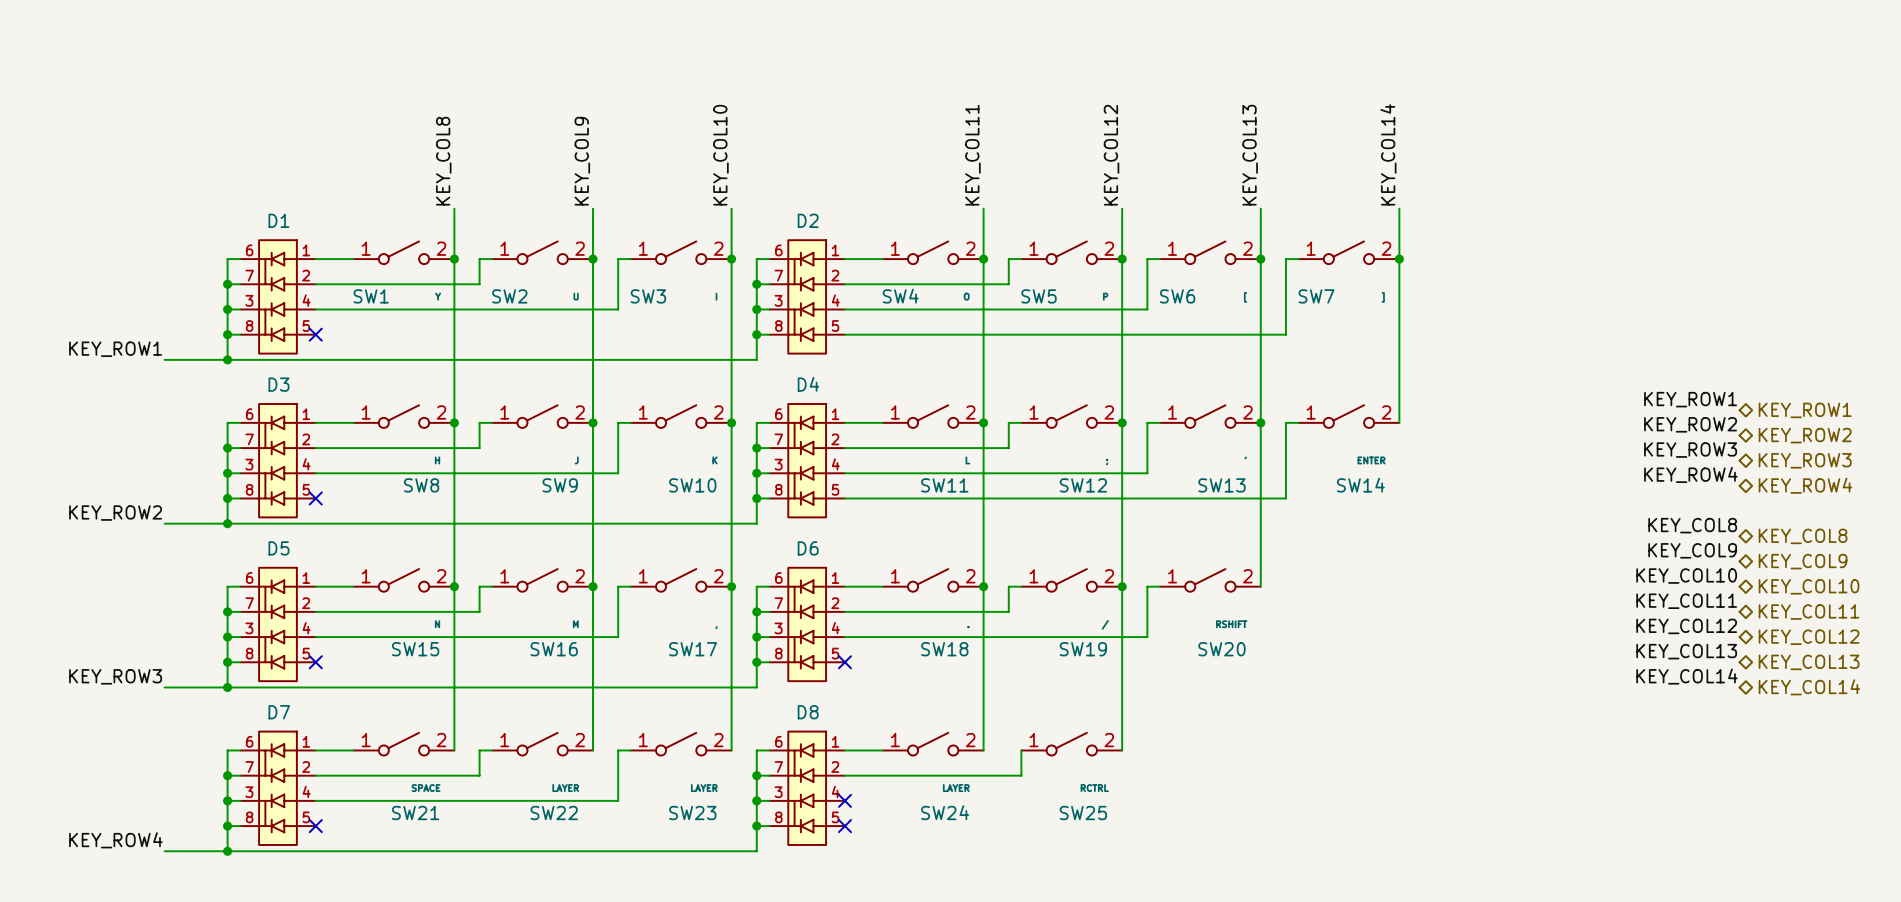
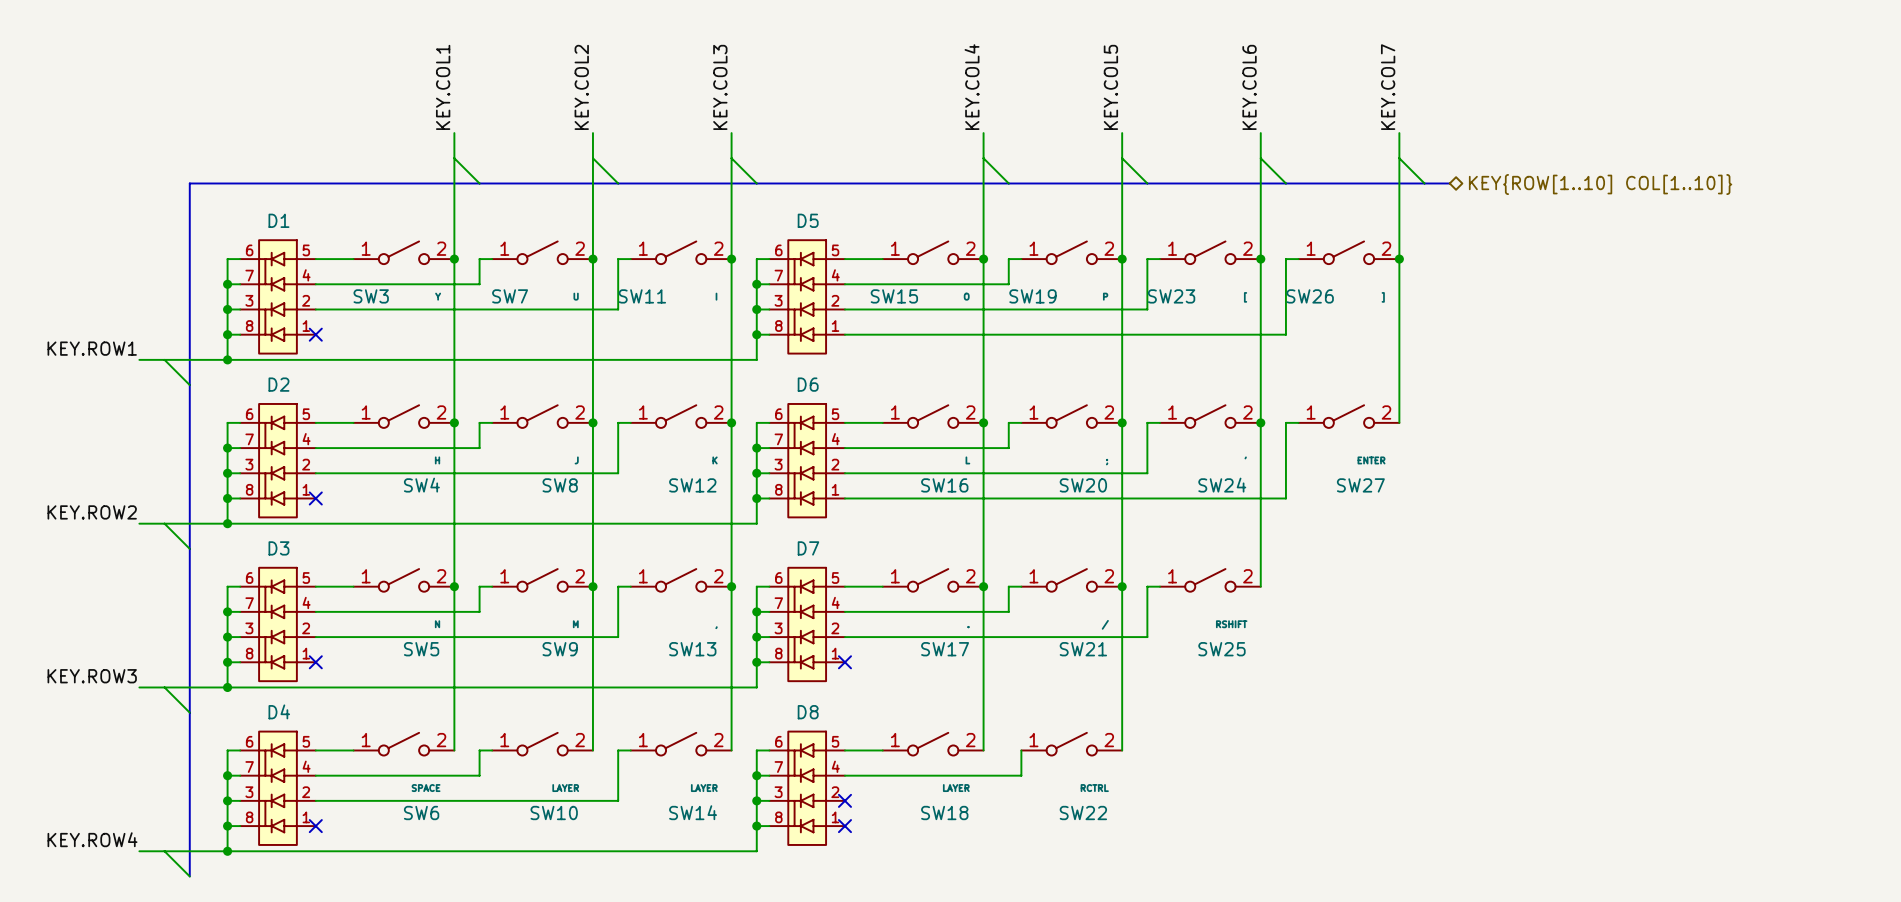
wire: none -> (454, 133) (454, 208)
wire: none -> (592, 133) (592, 208)
wire: none -> (731, 133) (731, 208)
wire: none -> (983, 133) (983, 208)
wire: none -> (1122, 133) (1122, 208)
wire: none -> (1260, 133) (1260, 208)
wire: none -> (1399, 133) (1399, 208)
label: KEY_COL14 (1388, 154) -> KEY.COL7 (1388, 87)
label: KEY_COL10 (720, 155) -> KEY.COL3 (720, 87)
label: KEY_COL11 (972, 155) -> KEY.COL4 (972, 87)
label: KEY_COL12 (1111, 155) -> KEY.COL5 (1110, 87)
label: KEY_COL13 (1250, 155) -> KEY.COL6 (1249, 87)
wire: none -> (454, 158) (479, 183)
wire: none -> (592, 158) (618, 183)
wire: none -> (731, 158) (756, 183)
wire: none -> (983, 158) (1008, 183)
wire: none -> (1122, 158) (1147, 183)
wire: none -> (1260, 158) (1285, 183)
wire: none -> (1399, 158) (1424, 183)
label: KEY_COL8 (443, 161) -> KEY.COL1 (443, 87)
label: KEY_COL9 (582, 161) -> KEY.COL2 (581, 87)
bus: none -> (1449, 183) (189, 183) (189, 876)
hierarchical label: none -> KEY{ROW[1..10] COL[1..10]} (1600, 184)
D1 pin number: 1 (306, 250) -> 5 (306, 250)
D2 pin number: 1 (835, 250) -> 5 (306, 414)
D1 pin number: 2 (306, 275) -> 4 (306, 275)
D2 pin number: 2 (835, 275) -> 4 (306, 439)
SW1 name: SW1 (371, 296) -> SW3 (371, 296)
SW2 name: SW2 (509, 296) -> SW7 (510, 296)
SW3 name: SW3 (648, 296) -> SW11 (642, 296)
D2 position: (807, 296) -> (277, 460)
SW4 name: SW4 (900, 296) -> SW15 (894, 296)
SW5 name: SW5 (1038, 296) -> SW19 (1032, 296)
SW6 name: SW6 (1177, 296) -> SW23 (1171, 296)
SW7 name: SW7 (1316, 296) -> SW26 (1310, 296)
D1 pin number: 4 (306, 300) -> 2 (306, 300)
D2 pin number: 4 (835, 300) -> 2 (306, 464)
D1 pin number: 5 (306, 326) -> 1 (306, 326)
D2 pin number: 5 (835, 326) -> 1 (306, 489)
label: KEY_ROW1 (115, 349) -> KEY.ROW1 (92, 348)
wire: none -> (139, 359) (164, 359) (189, 385)
label: KEY_ROW1 (1690, 399) -> none
hierarchical label: KEY_ROW1 (1805, 410) -> none
D3 pin number: 1 (306, 414) -> 5 (306, 578)
D4 pin number: 1 (835, 414) -> 5 (306, 741)
label: KEY_ROW2 (1690, 424) -> none
hierarchical label: KEY_ROW2 (1805, 435) -> none
D3 pin number: 2 (306, 439) -> 4 (306, 602)
D4 pin number: 2 (835, 439) -> 4 (306, 766)
label: KEY_ROW3 (1690, 450) -> none
D3 position: (277, 460) -> (277, 624)
D4 position: (807, 460) -> (277, 788)
hierarchical label: KEY_ROW3 (1805, 460) -> none
D3 pin number: 4 (306, 464) -> 2 (306, 628)
D4 pin number: 4 (835, 464) -> 2 (306, 792)
label: KEY_ROW4 (1690, 474) -> none
SW8 name: SW8 (421, 485) -> SW4 (421, 485)
SW9 name: SW9 (560, 485) -> SW8 (560, 485)
SW10 name: SW10 (692, 485) -> SW12 (692, 485)
SW11 name: SW11 (944, 485) -> SW16 (944, 485)
SW12 name: SW12 (1083, 485) -> SW20 (1083, 485)
SW13 name: SW13 (1221, 485) -> SW24 (1222, 485)
SW14 name: SW14 (1360, 485) -> SW27 (1360, 485)
hierarchical label: KEY_ROW4 (1805, 485) -> none
D3 pin number: 5 (306, 489) -> 1 (306, 653)
D4 pin number: 5 (835, 489) -> 1 (306, 817)
label: KEY_ROW2 (115, 513) -> KEY.ROW2 (92, 512)
wire: none -> (139, 523) (164, 523) (189, 548)
label: KEY_COL8 (1692, 525) -> none
hierarchical label: KEY_COL8 (1803, 536) -> none
label: KEY_COL9 (1692, 550) -> none
hierarchical label: KEY_COL9 (1803, 561) -> none
label: KEY_COL10 (1686, 576) -> none
D5 pin number: 1 (306, 578) -> 5 (835, 250)
D6 pin number: 1 (835, 578) -> 5 (835, 414)
hierarchical label: KEY_COL10 (1809, 586) -> none
label: KEY_COL11 (1686, 601) -> none
D5 pin number: 2 (306, 603) -> 4 (835, 275)
D6 pin number: 2 (835, 603) -> 4 (835, 439)
hierarchical label: KEY_COL11 (1809, 612) -> none
D5 position: (277, 624) -> (807, 296)
D6 position: (807, 624) -> (807, 460)
label: KEY_COL12 (1686, 626) -> none
D5 pin number: 4 (306, 628) -> 2 (835, 300)
D6 pin number: 4 (835, 628) -> 2 (835, 464)
hierarchical label: KEY_COL12 (1809, 637) -> none
SW15 name: SW15 (415, 649) -> SW5 (421, 649)
SW16 name: SW16 (554, 649) -> SW9 (560, 649)
SW17 name: SW17 (693, 649) -> SW13 (692, 649)
SW18 name: SW18 (944, 649) -> SW17 (945, 649)
SW19 name: SW19 (1083, 649) -> SW21 (1083, 649)
SW20 name: SW20 (1221, 649) -> SW25 (1221, 649)
label: KEY_COL13 (1686, 651) -> none
D5 pin number: 5 (306, 653) -> 1 (835, 326)
D6 pin number: 5 (835, 653) -> 1 (835, 489)
hierarchical label: KEY_COL13 (1809, 662) -> none
label: KEY_ROW3 (115, 676) -> KEY.ROW3 (92, 676)
label: KEY_COL14 (1686, 676) -> none
wire: none -> (139, 687) (164, 687) (189, 712)
hierarchical label: KEY_COL14 (1809, 687) -> none
D7 pin number: 1 (306, 741) -> 5 (835, 578)
D8 pin number: 1 (835, 741) -> 5 (835, 741)
D7 pin number: 2 (306, 767) -> 4 (835, 602)
D8 pin number: 2 (835, 767) -> 4 (835, 766)
D7 position: (277, 788) -> (807, 624)
D7 pin number: 4 (306, 791) -> 2 (835, 628)
D8 pin number: 4 (835, 791) -> 2 (835, 792)
SW24 name: SW24 (945, 812) -> SW18 (944, 813)
SW21 name: SW21 (415, 813) -> SW6 (421, 813)
SW22 name: SW22 (554, 813) -> SW10 (554, 813)
SW23 name: SW23 (692, 813) -> SW14 (693, 812)
SW25 name: SW25 (1083, 813) -> SW22 (1083, 813)
D7 pin number: 5 (306, 817) -> 1 (835, 653)
D8 pin number: 5 (835, 817) -> 1 (835, 817)
label: KEY_ROW4 (115, 840) -> KEY.ROW4 (92, 839)
wire: none -> (139, 851) (164, 851) (189, 876)

